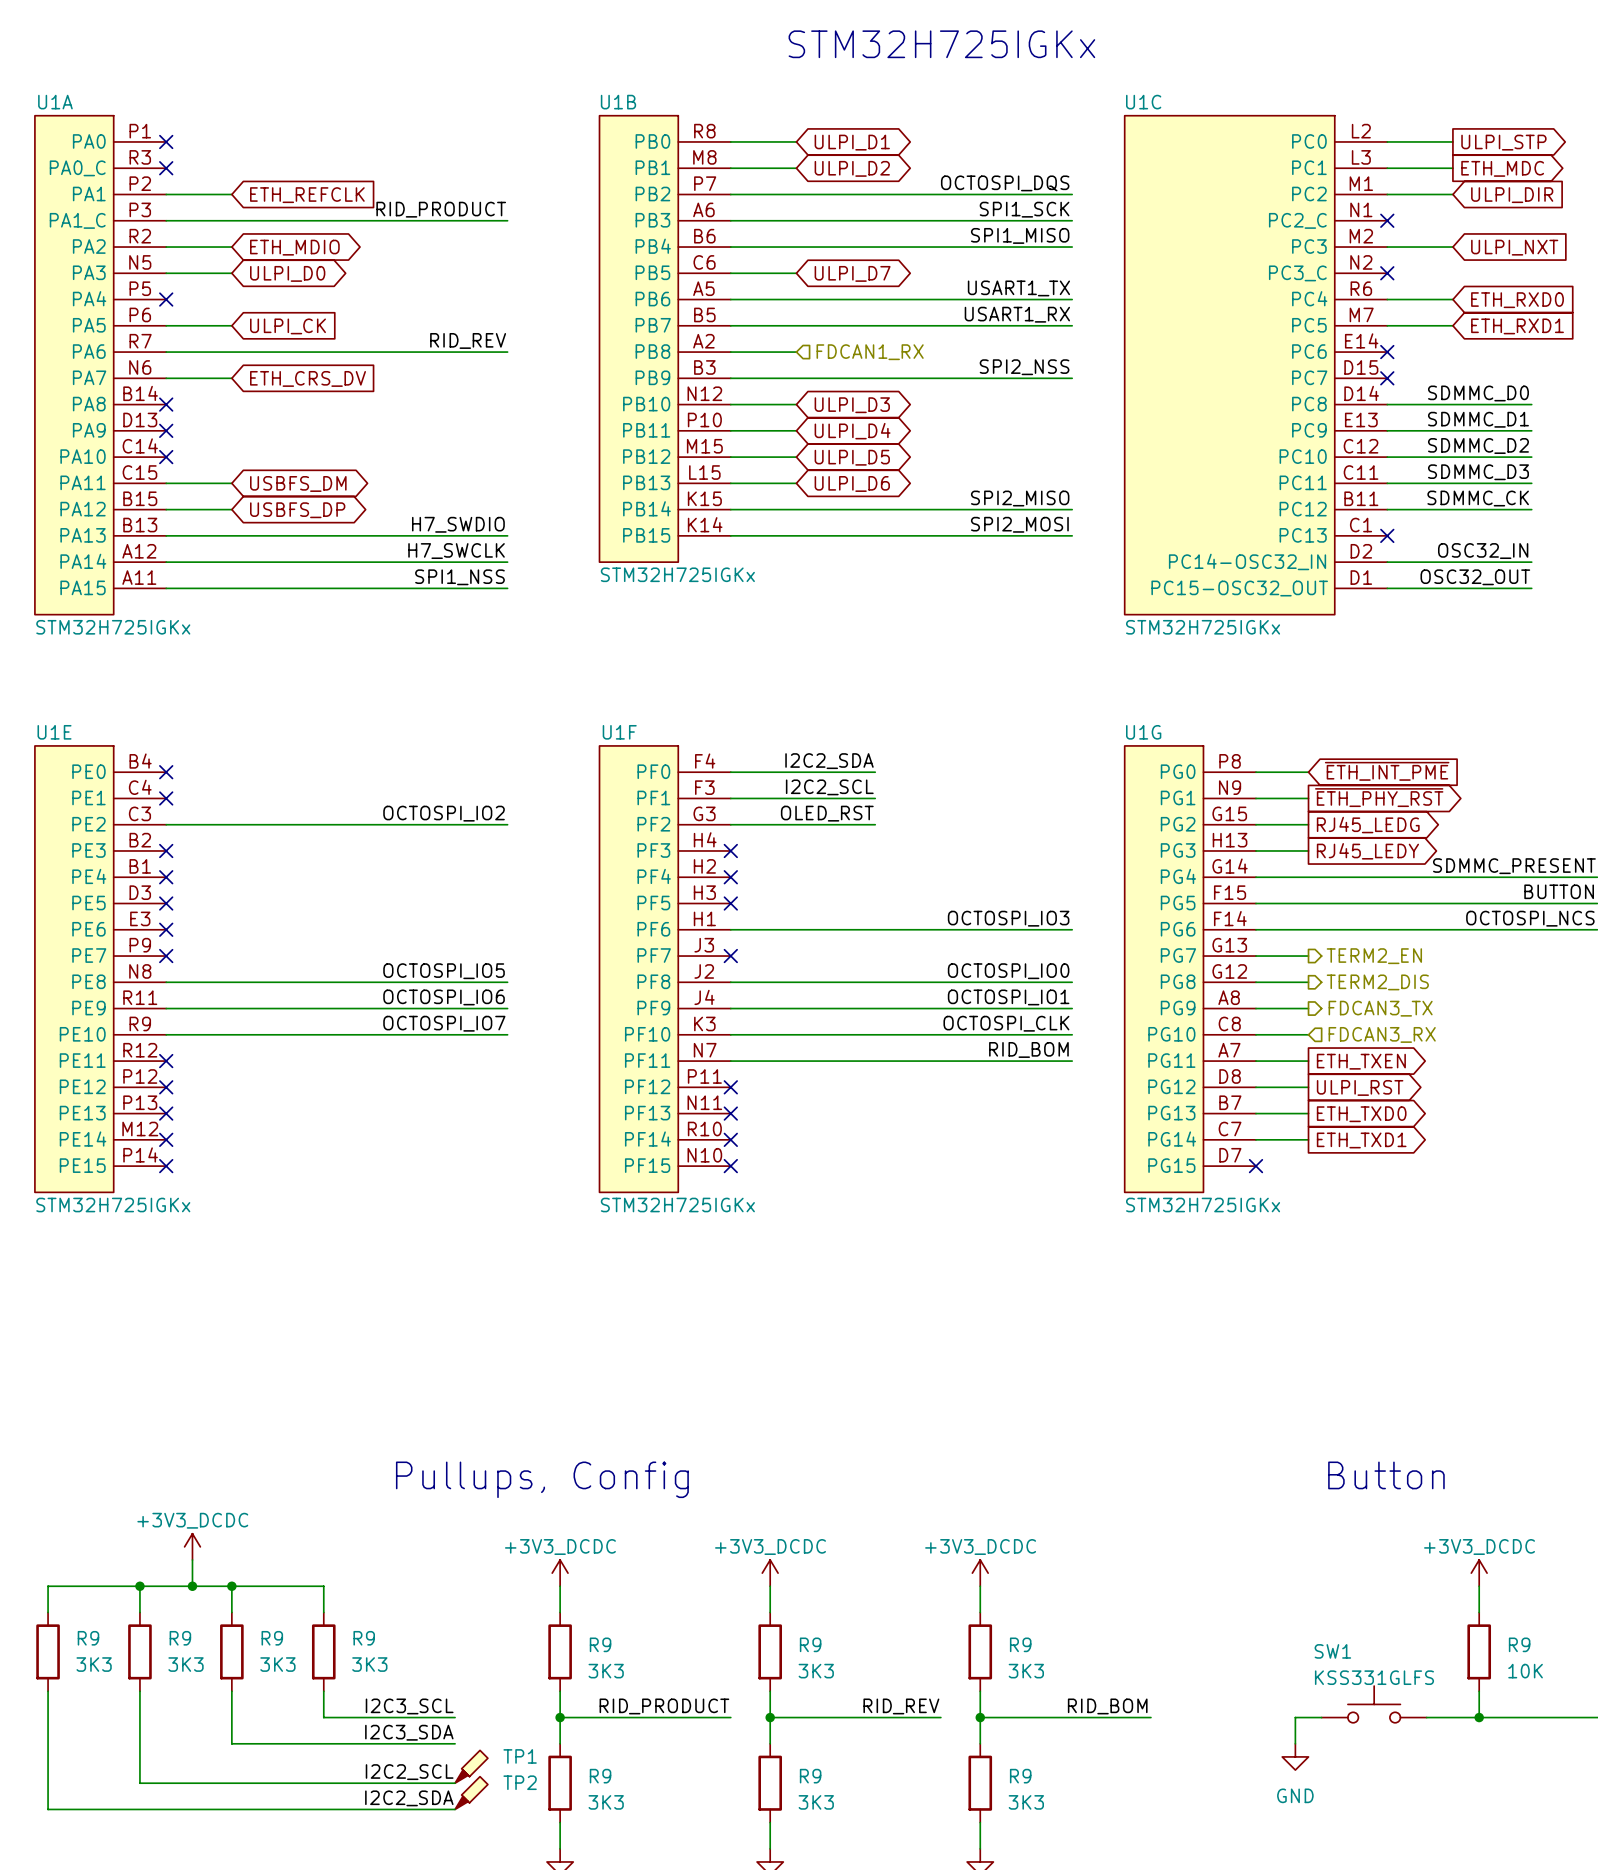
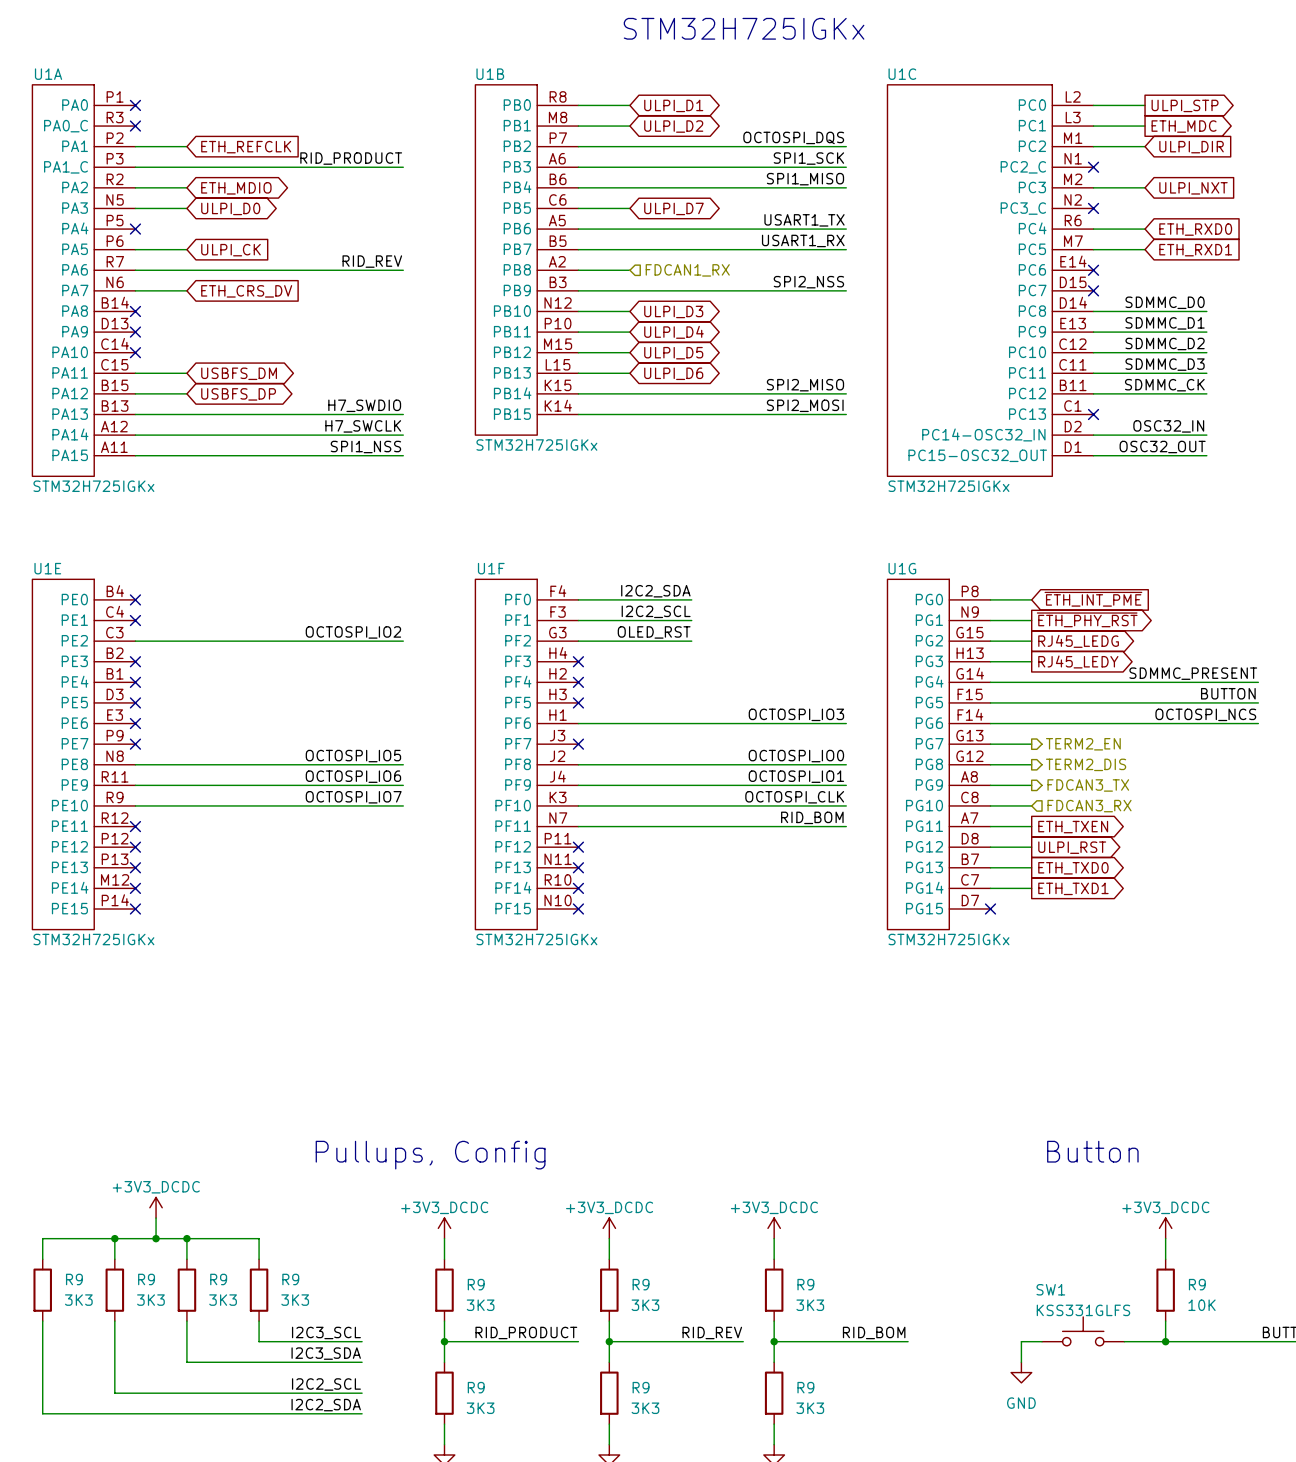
U1A symbol: [34, 115, 167, 615] -> [32, 84, 136, 477]
U1B symbol: [599, 115, 731, 563] -> [475, 84, 579, 436]
U1C symbol: [1124, 115, 1388, 615] -> [887, 84, 1094, 477]
U1E symbol: [34, 745, 167, 1193] -> [32, 579, 136, 930]
U1F symbol: [599, 745, 731, 1193] -> [475, 579, 579, 930]
U1G symbol: [1124, 745, 1256, 1193] -> [887, 579, 991, 930]
TP1: (471, 1766) -> none
TP2: (471, 1793) -> none

